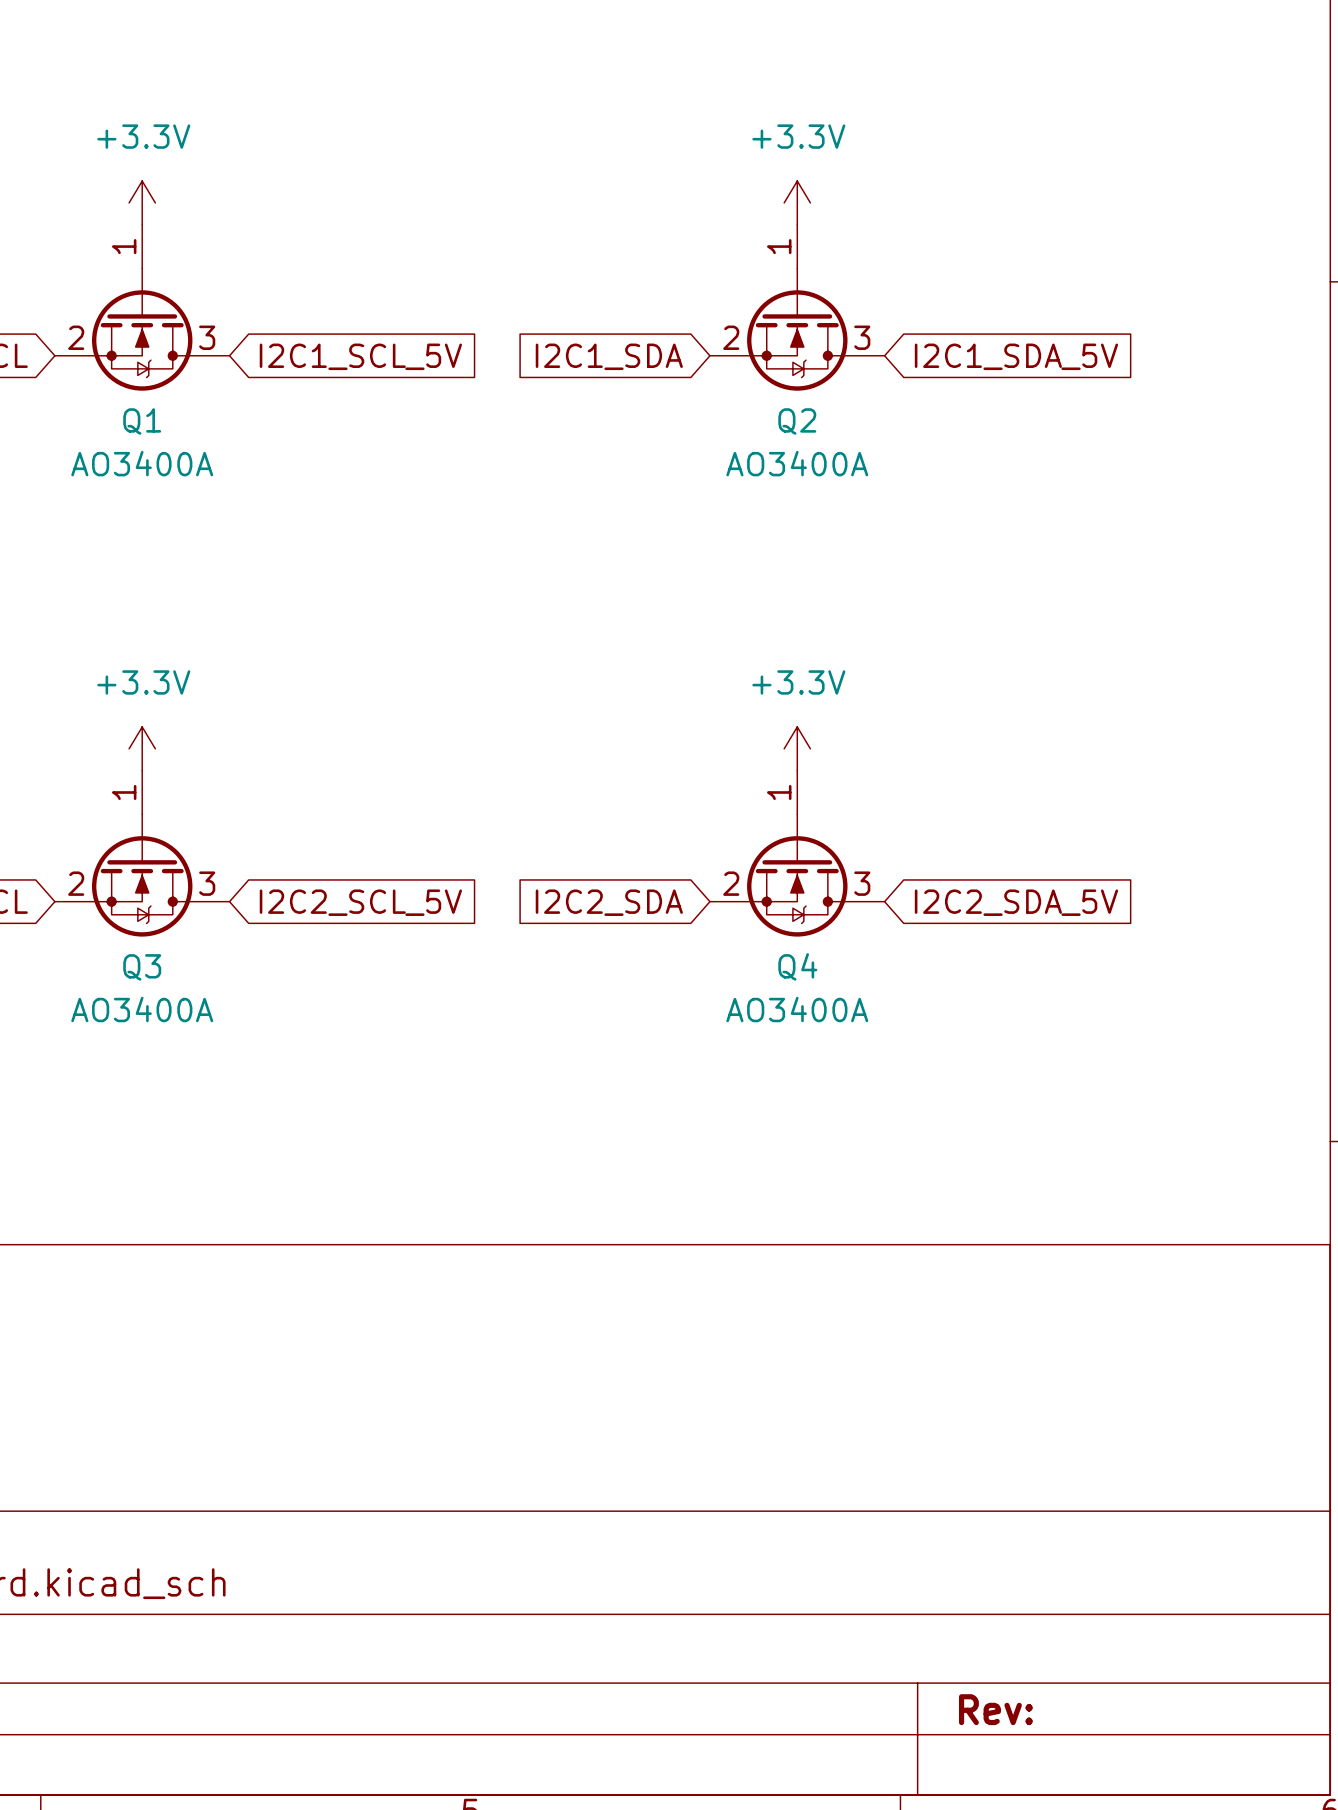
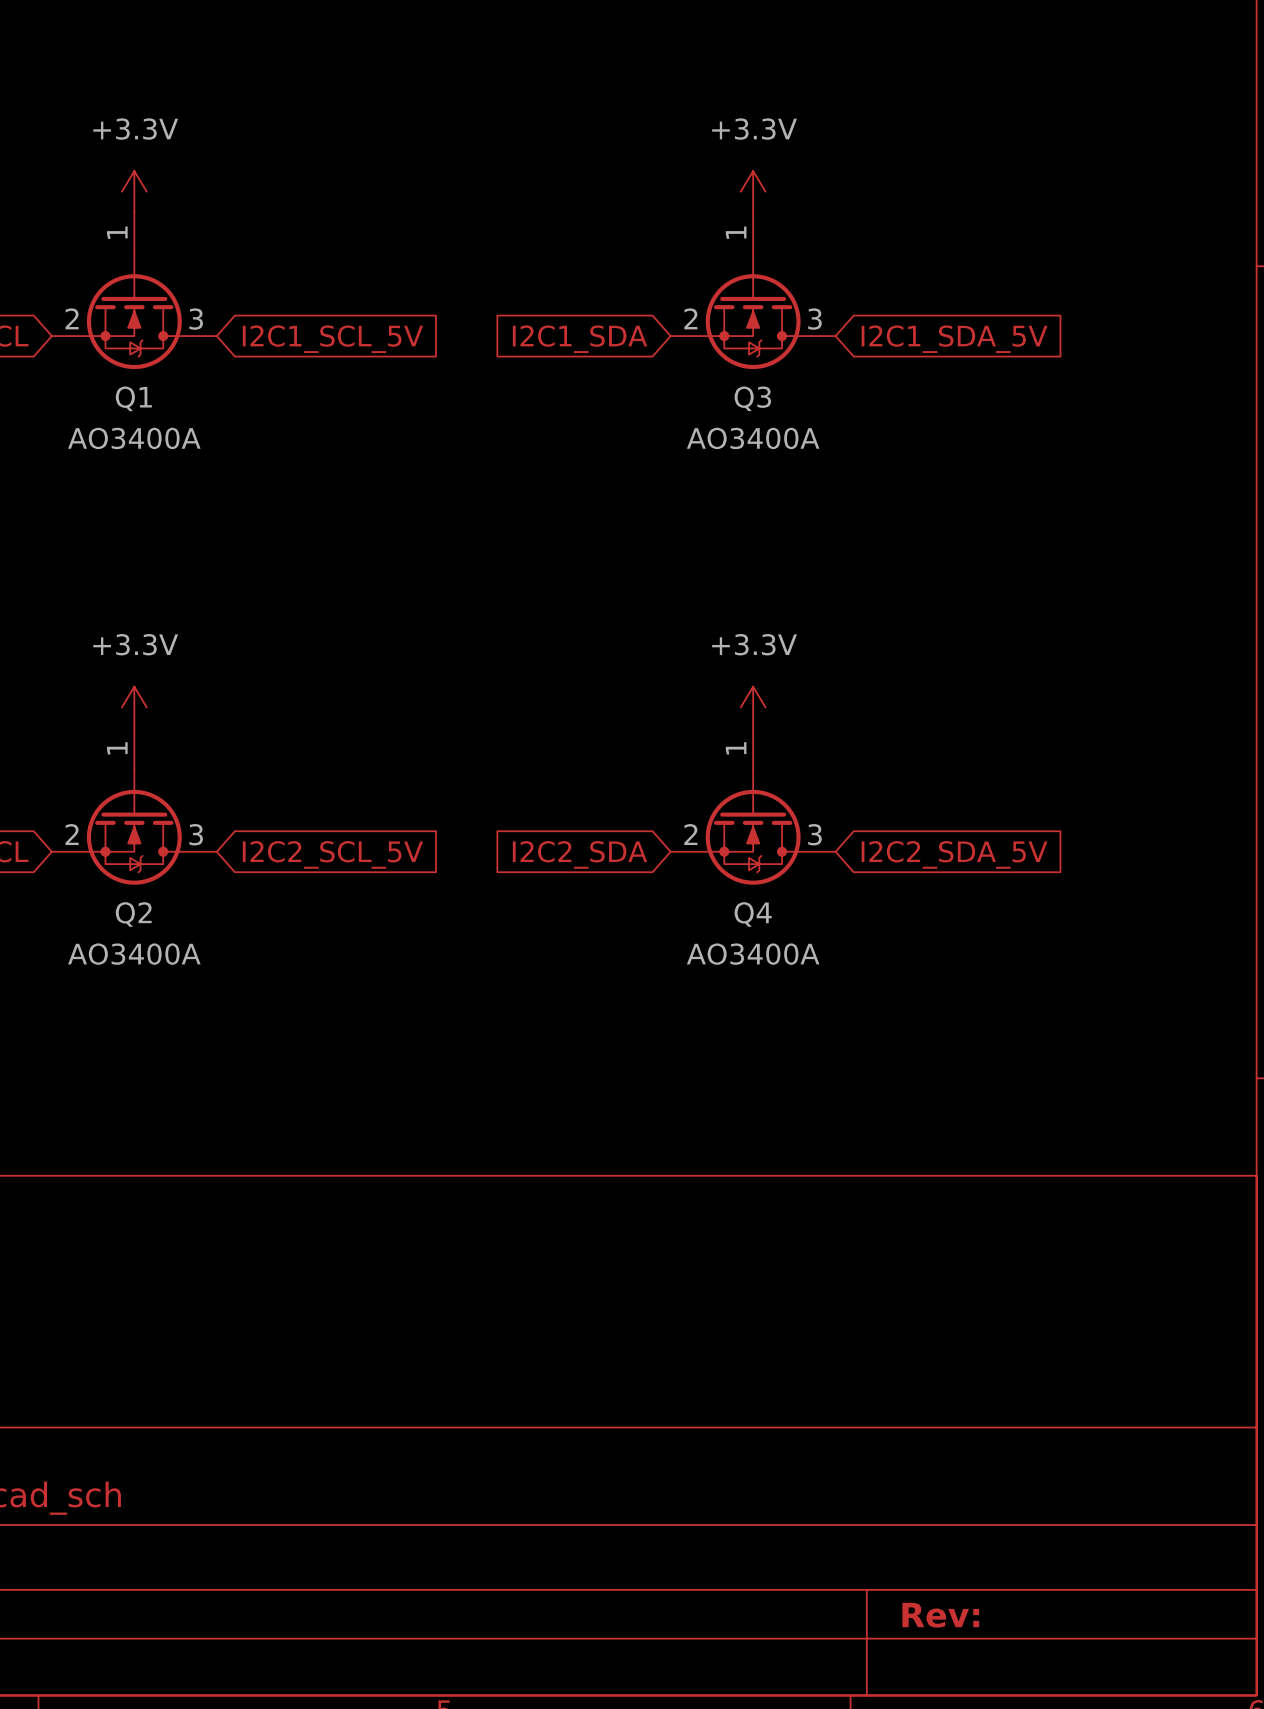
Q2 name: Q2 (797, 421) -> Q3 (752, 398)
Q3 name: Q3 (142, 967) -> Q2 (133, 914)

